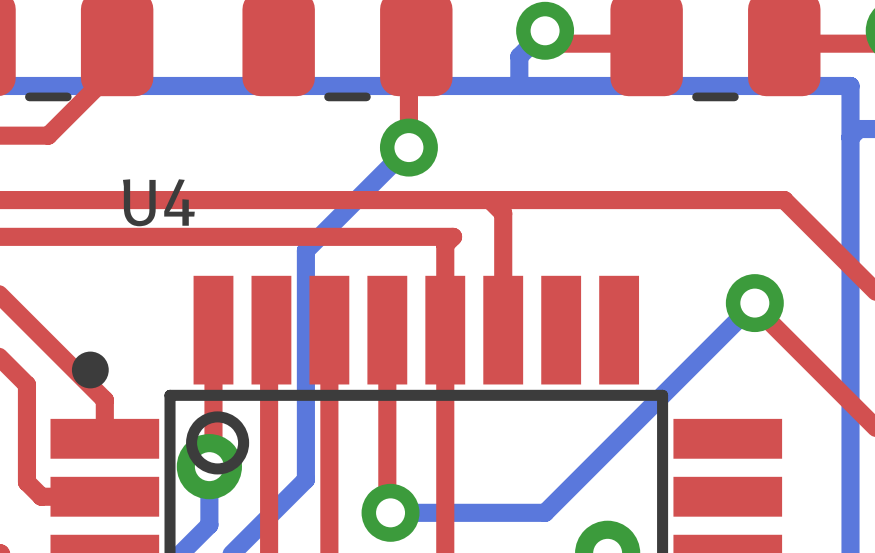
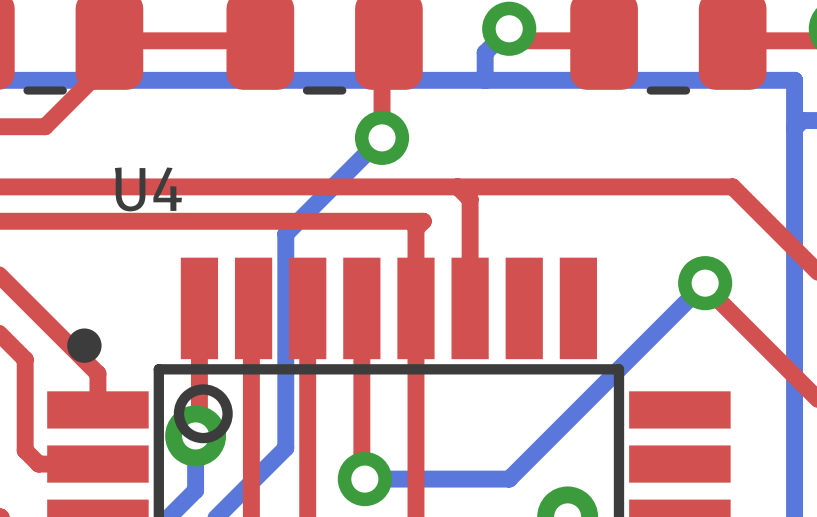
top track: none -> (109, 40) (260, 40)

